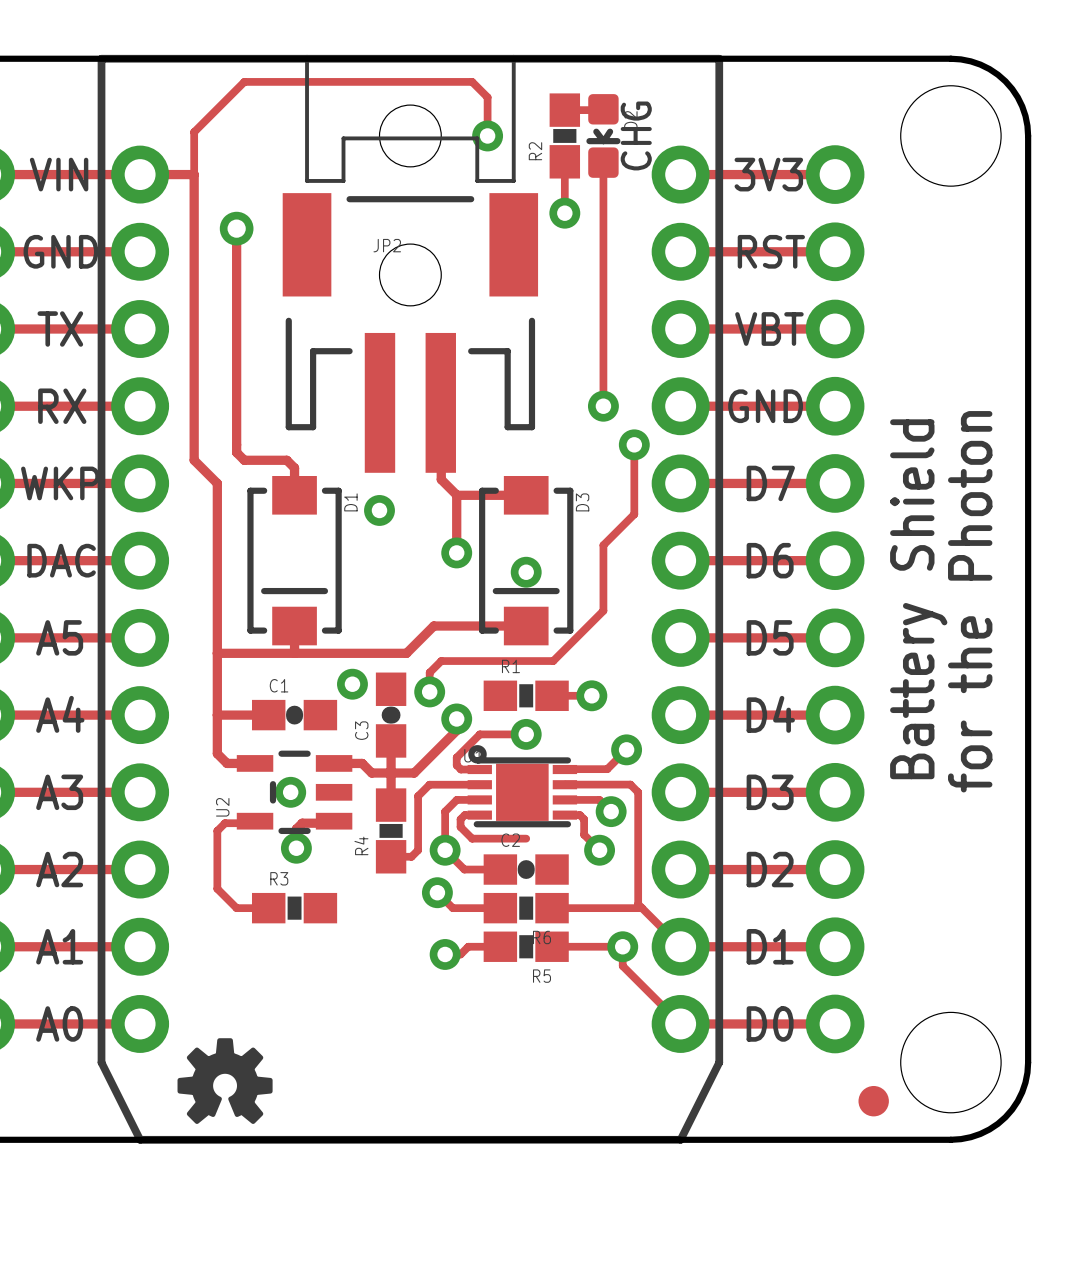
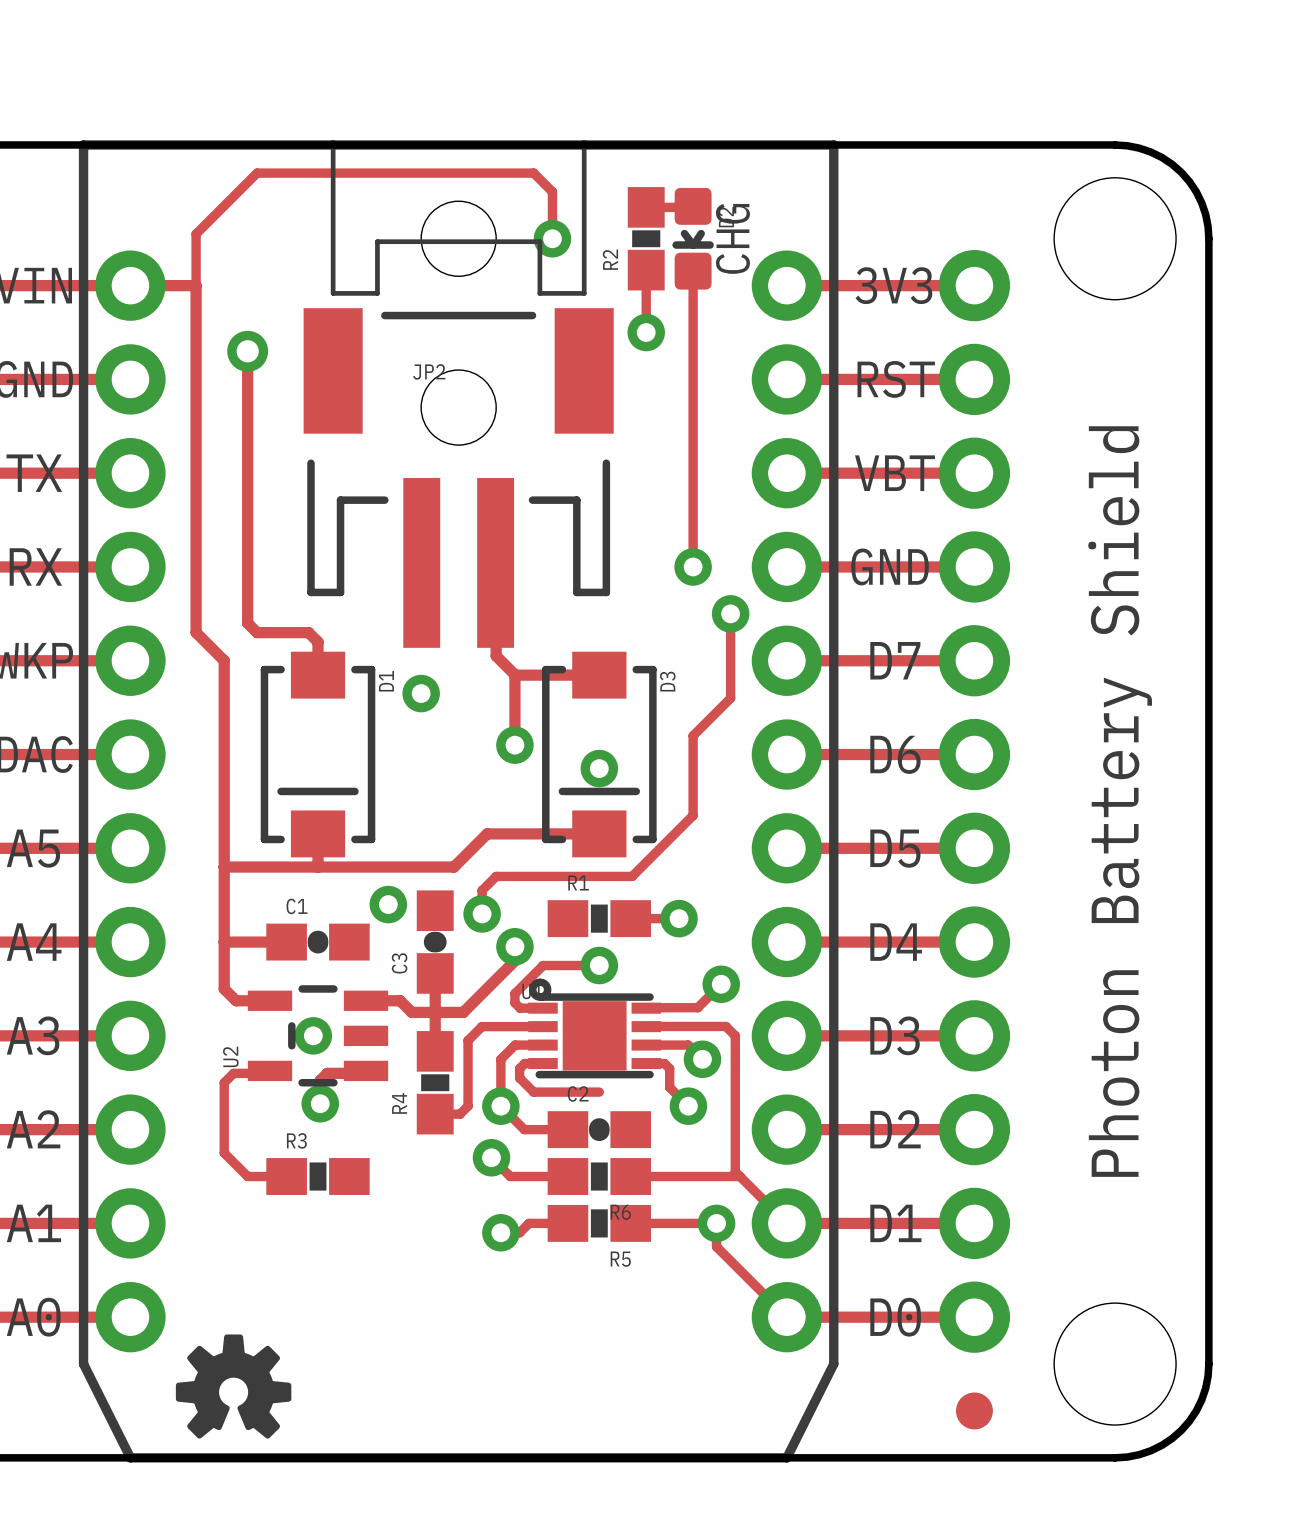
text: Battery Shield (918, 599) -> Photon Battery Shield (1120, 801)
text: for the Photon (970, 601) -> none
part position: (873, 1101) -> (974, 1410)

